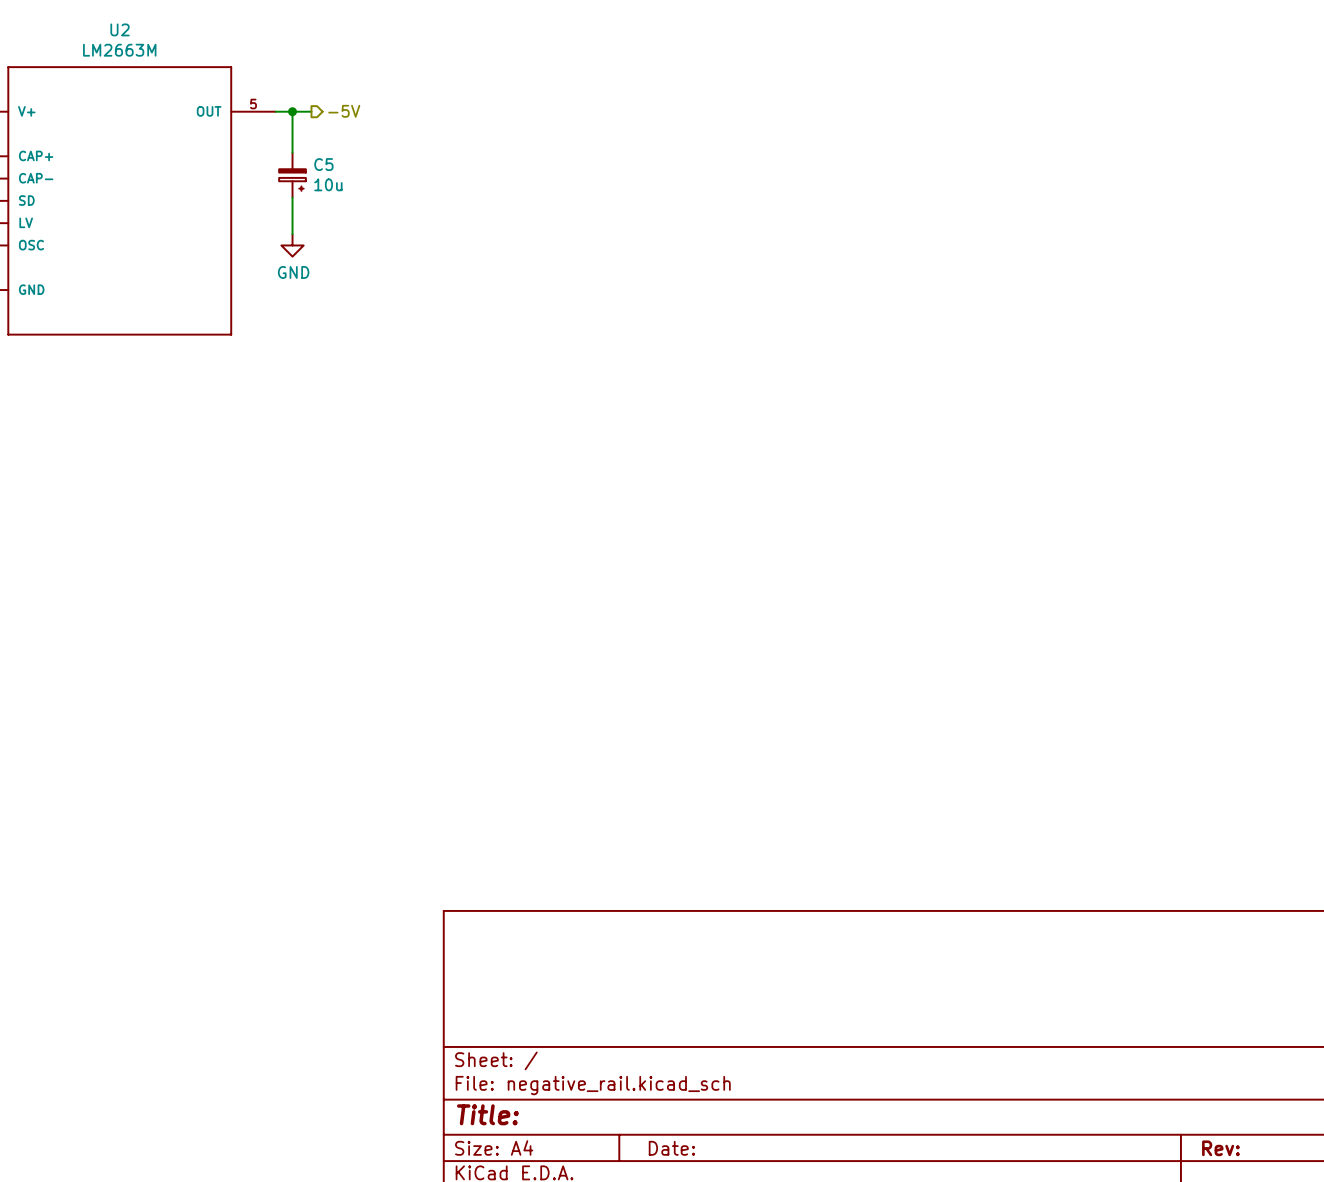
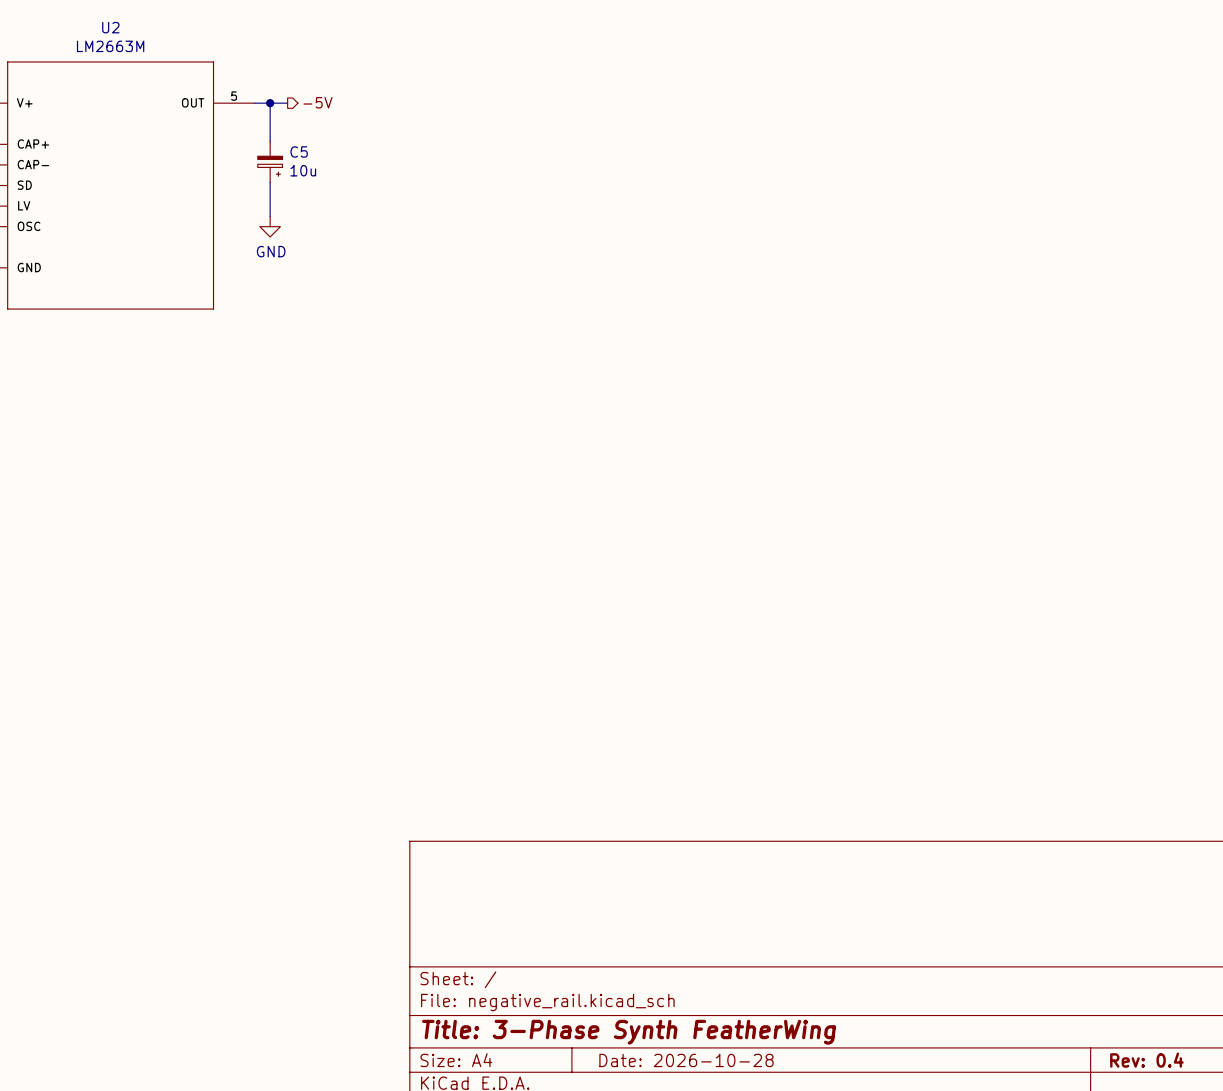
title block: Title: (487, 1114) -> Title: 3-Phase Synth FeatherWing (629, 1032)
title block: Date: (671, 1148) -> Date: 2026-10-28 (686, 1060)
title block: Rev: (1220, 1148) -> Rev: 0.4 (1146, 1060)

